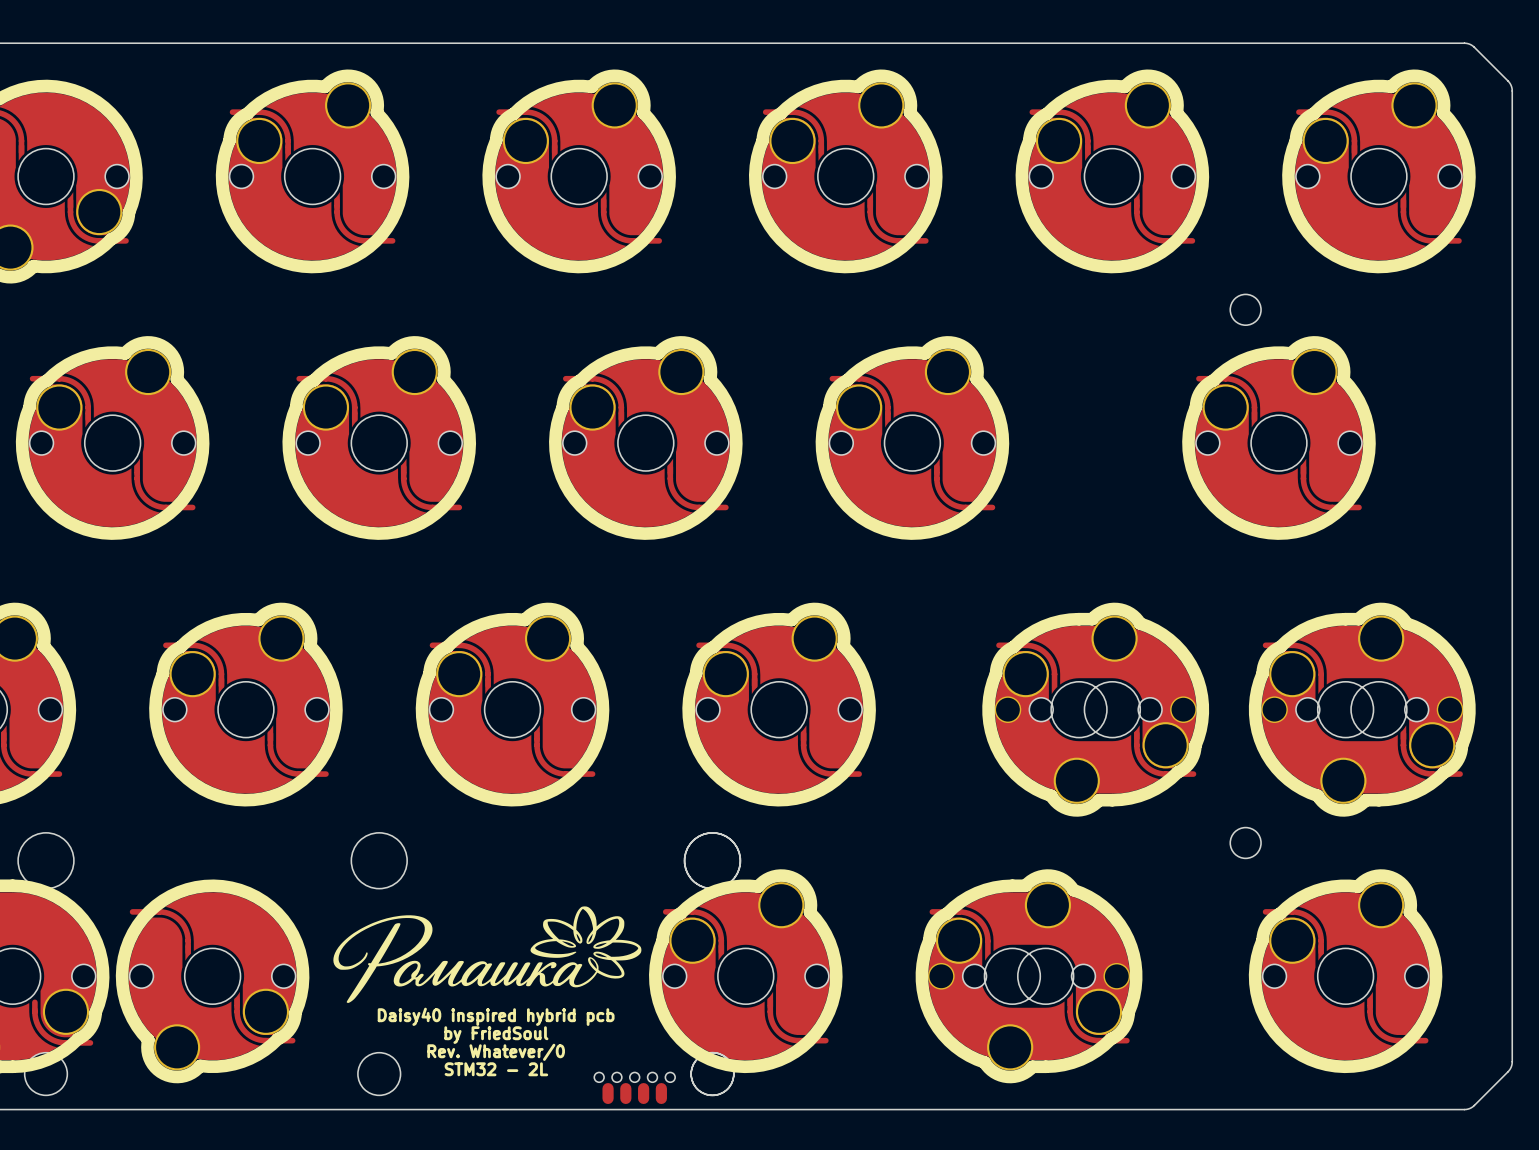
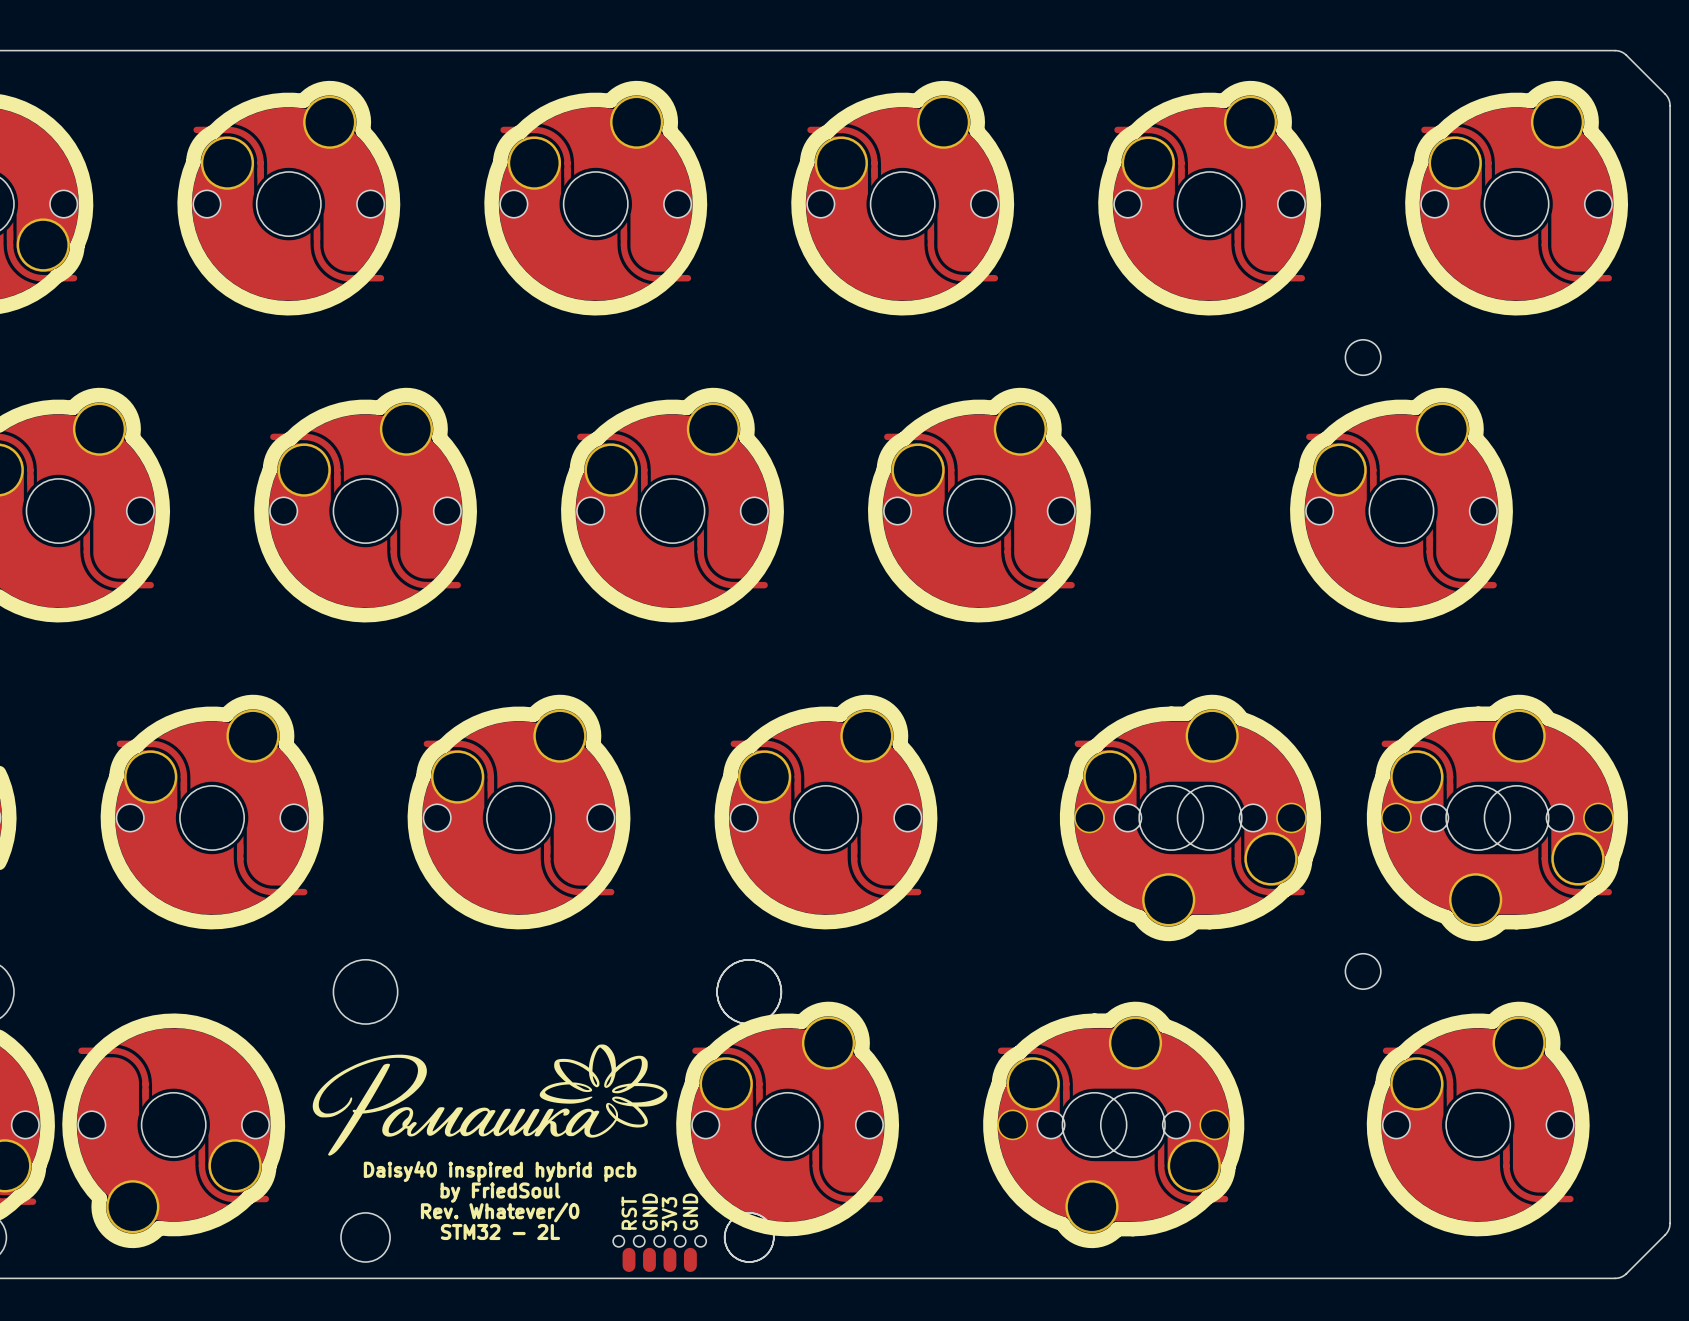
part rotation: 0° (1095, 709) -> 180° (1190, 817)
part rotation: 0° (1362, 709) -> 180° (1497, 817)
part rotation: 0° (1029, 976) -> 180° (1113, 1124)
text: none -> GND (650, 1211)
text: none -> GND (690, 1211)
text: none -> RST (629, 1213)
text: none -> 3V3 (669, 1214)

